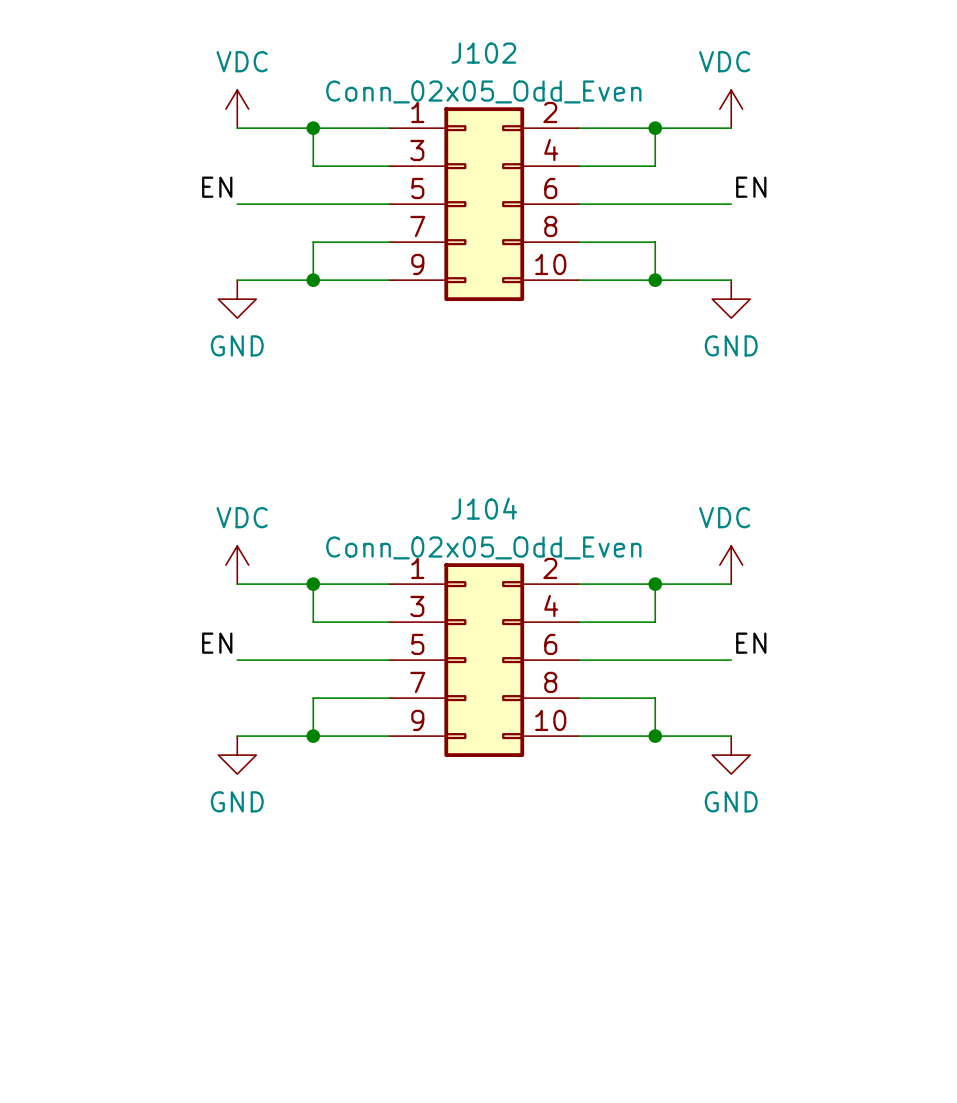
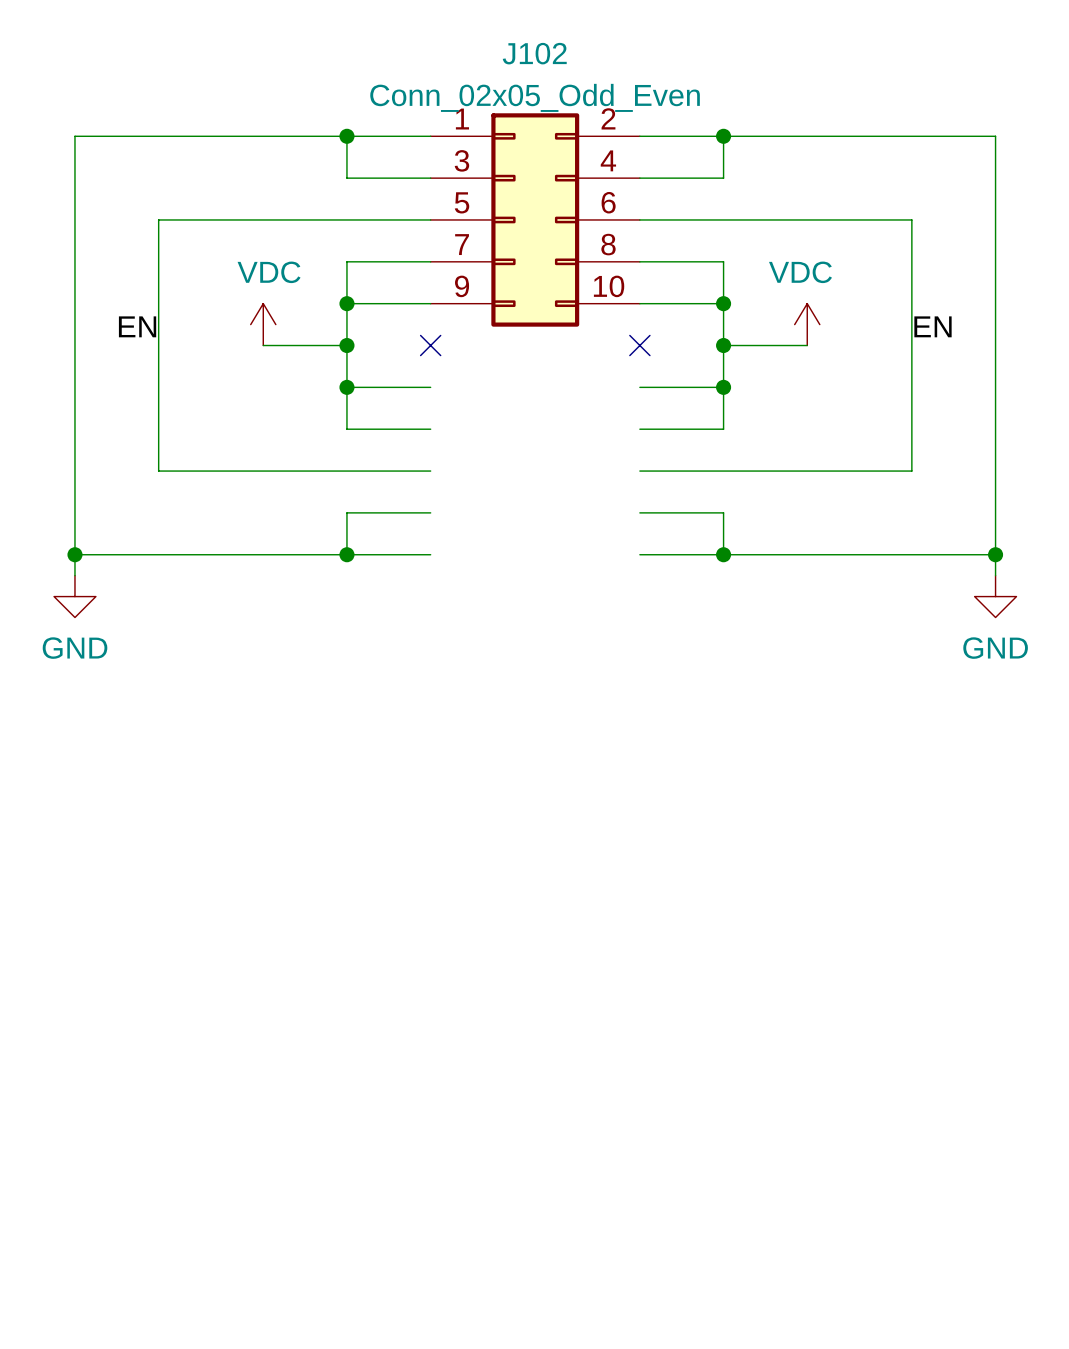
power symbol: VDC (237, 109) -> none
power symbol: VDC (731, 109) -> none
wire: none -> (263, 136) (74, 136) (74, 575)
wire: none -> (807, 136) (995, 136) (995, 575)
label position: EN (217, 187) -> EN (137, 326)
label position: EN (751, 187) -> EN (933, 326)
wire: none -> (263, 219) (158, 219) (158, 471) (430, 471)
wire: none -> (807, 219) (911, 219) (911, 471) (639, 471)
wire: (237, 280) (313, 280) -> (430, 429) (346, 429) (346, 303)
wire: (655, 280) (731, 280) -> (723, 303) (723, 429) (639, 429)
power symbol: GND (237, 299) -> VDC (263, 324)
power symbol: GND (731, 299) -> VDC (807, 324)
wire: none -> (263, 345) (346, 345)
junction: none -> (346, 345)
no-connect mark: none -> (430, 345)
no-connect mark: none -> (639, 345)
wire: none -> (723, 345) (807, 345)
junction: none -> (723, 345)
wire: none -> (346, 387) (430, 387)
junction: none -> (346, 387)
wire: none -> (639, 387) (723, 387)
junction: none -> (723, 387)
wire: none -> (74, 554) (430, 554)
junction: none -> (74, 554)
wire: none -> (639, 554) (995, 554)
junction: none -> (995, 554)
power symbol: VDC (237, 565) -> none
power symbol: VDC (731, 565) -> none
wire: (237, 584) (389, 584) -> none
wire: (313, 584) (313, 622) (389, 622) -> none
junction position: (313, 584) -> (346, 554)
wire: (579, 584) (731, 584) -> none
wire: (655, 584) (655, 622) (579, 622) -> none
junction position: (655, 584) -> (723, 554)
label: EN (217, 643) -> none
label: EN (751, 643) -> none
wire: (237, 660) (389, 660) -> none
J104: Conn_02x05_Odd_Even (484, 660) -> none
wire: (579, 660) (731, 660) -> none
wire: (389, 698) (313, 698) (313, 736) -> (430, 512) (346, 512) (346, 554)
wire: (579, 698) (655, 698) (655, 736) -> (639, 512) (723, 512) (723, 554)
wire: (237, 736) (389, 736) -> none
junction: (313, 736) -> none
wire: (579, 736) (731, 736) -> none
junction: (655, 736) -> none
power symbol position: GND (237, 755) -> GND (74, 596)
power symbol position: GND (731, 755) -> GND (995, 596)

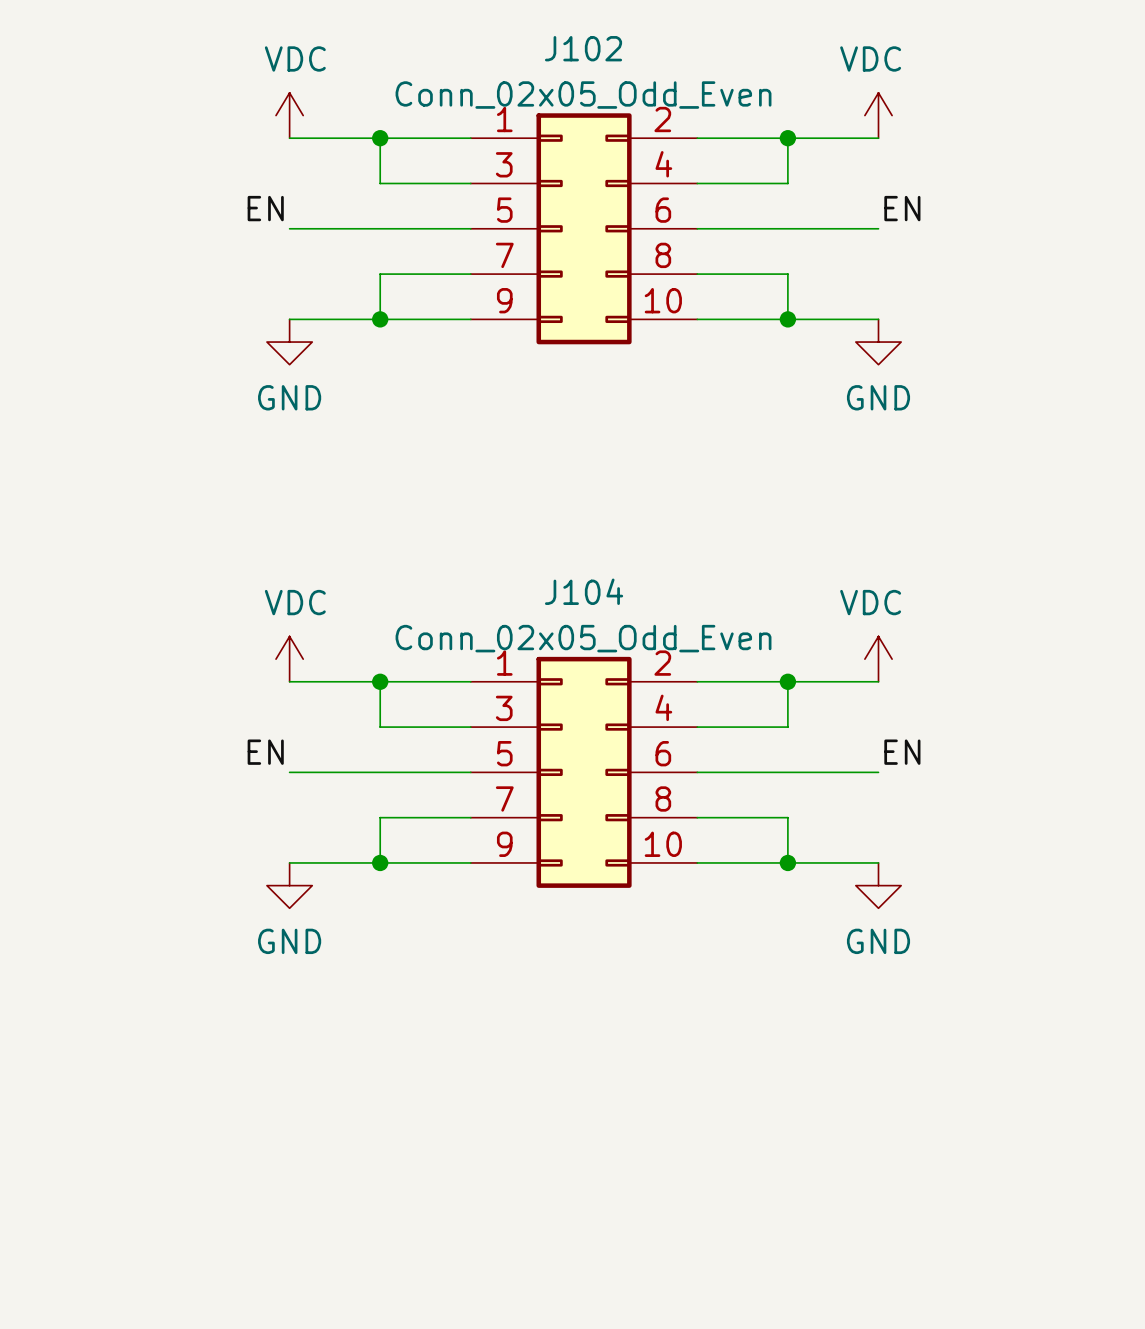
power symbol: none -> VDC (289, 115)
power symbol: none -> VDC (878, 115)
wire: (263, 136) (74, 136) (74, 575) -> none
wire: (807, 136) (995, 136) (995, 575) -> none
wire: (263, 219) (158, 219) (158, 471) (430, 471) -> none
wire: (807, 219) (911, 219) (911, 471) (639, 471) -> none
wire: (346, 303) (346, 429) (430, 429) -> (380, 319) (289, 319)
wire: (723, 303) (723, 429) (639, 429) -> (787, 319) (878, 319)
power symbol: VDC (263, 324) -> GND (289, 342)
power symbol: VDC (807, 324) -> GND (878, 342)
label position: EN (137, 326) -> EN (265, 208)
label position: EN (933, 326) -> EN (902, 208)
wire: (263, 345) (346, 345) -> none
junction: (346, 345) -> none
no-connect mark: (430, 345) -> none
no-connect mark: (639, 345) -> none
wire: (723, 345) (807, 345) -> none
junction: (723, 345) -> none
wire: (346, 387) (430, 387) -> none
junction: (346, 387) -> none
wire: (639, 387) (723, 387) -> none
junction: (723, 387) -> none
wire: (430, 512) (346, 512) (346, 554) -> (470, 817) (380, 817) (380, 862)
wire: (639, 512) (723, 512) (723, 554) -> (697, 817) (787, 817) (787, 862)
wire: (74, 554) (430, 554) -> none
junction: (74, 554) -> none
junction position: (346, 554) -> (380, 681)
wire: (639, 554) (995, 554) -> none
junction position: (723, 554) -> (787, 681)
junction: (995, 554) -> none
power symbol position: GND (74, 596) -> GND (289, 885)
power symbol position: GND (995, 596) -> GND (878, 885)
power symbol: none -> VDC (289, 659)
power symbol: none -> VDC (878, 659)
wire: none -> (289, 681) (470, 681)
wire: none -> (380, 681) (380, 727) (470, 727)
wire: none -> (697, 681) (878, 681)
wire: none -> (787, 681) (787, 727) (697, 727)
label: none -> EN (265, 752)
label: none -> EN (902, 752)
wire: none -> (289, 772) (470, 772)
J104: none -> Conn_02x05_Odd_Even (584, 772)
wire: none -> (697, 772) (878, 772)
wire: none -> (289, 862) (470, 862)
junction: none -> (380, 862)
wire: none -> (697, 862) (878, 862)
junction: none -> (787, 862)

